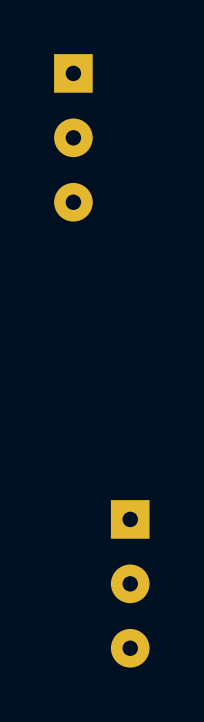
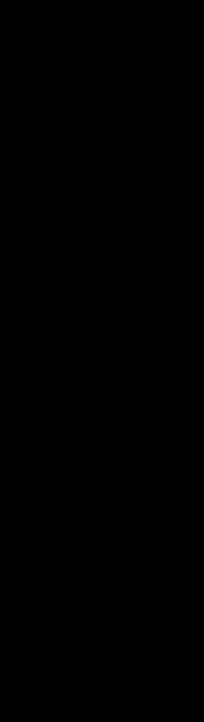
part: (73, 137) -> none
part: (130, 583) -> none

